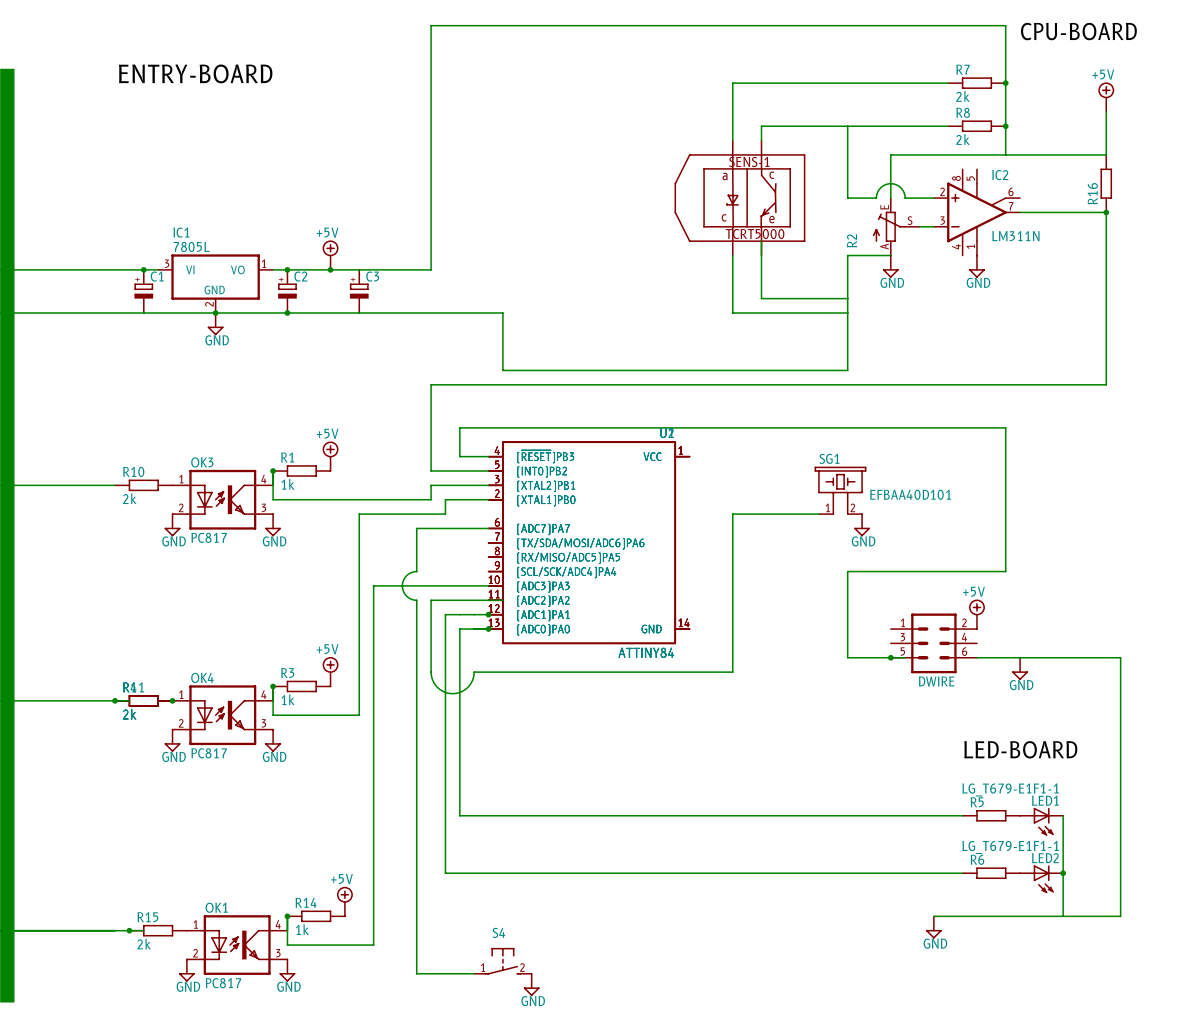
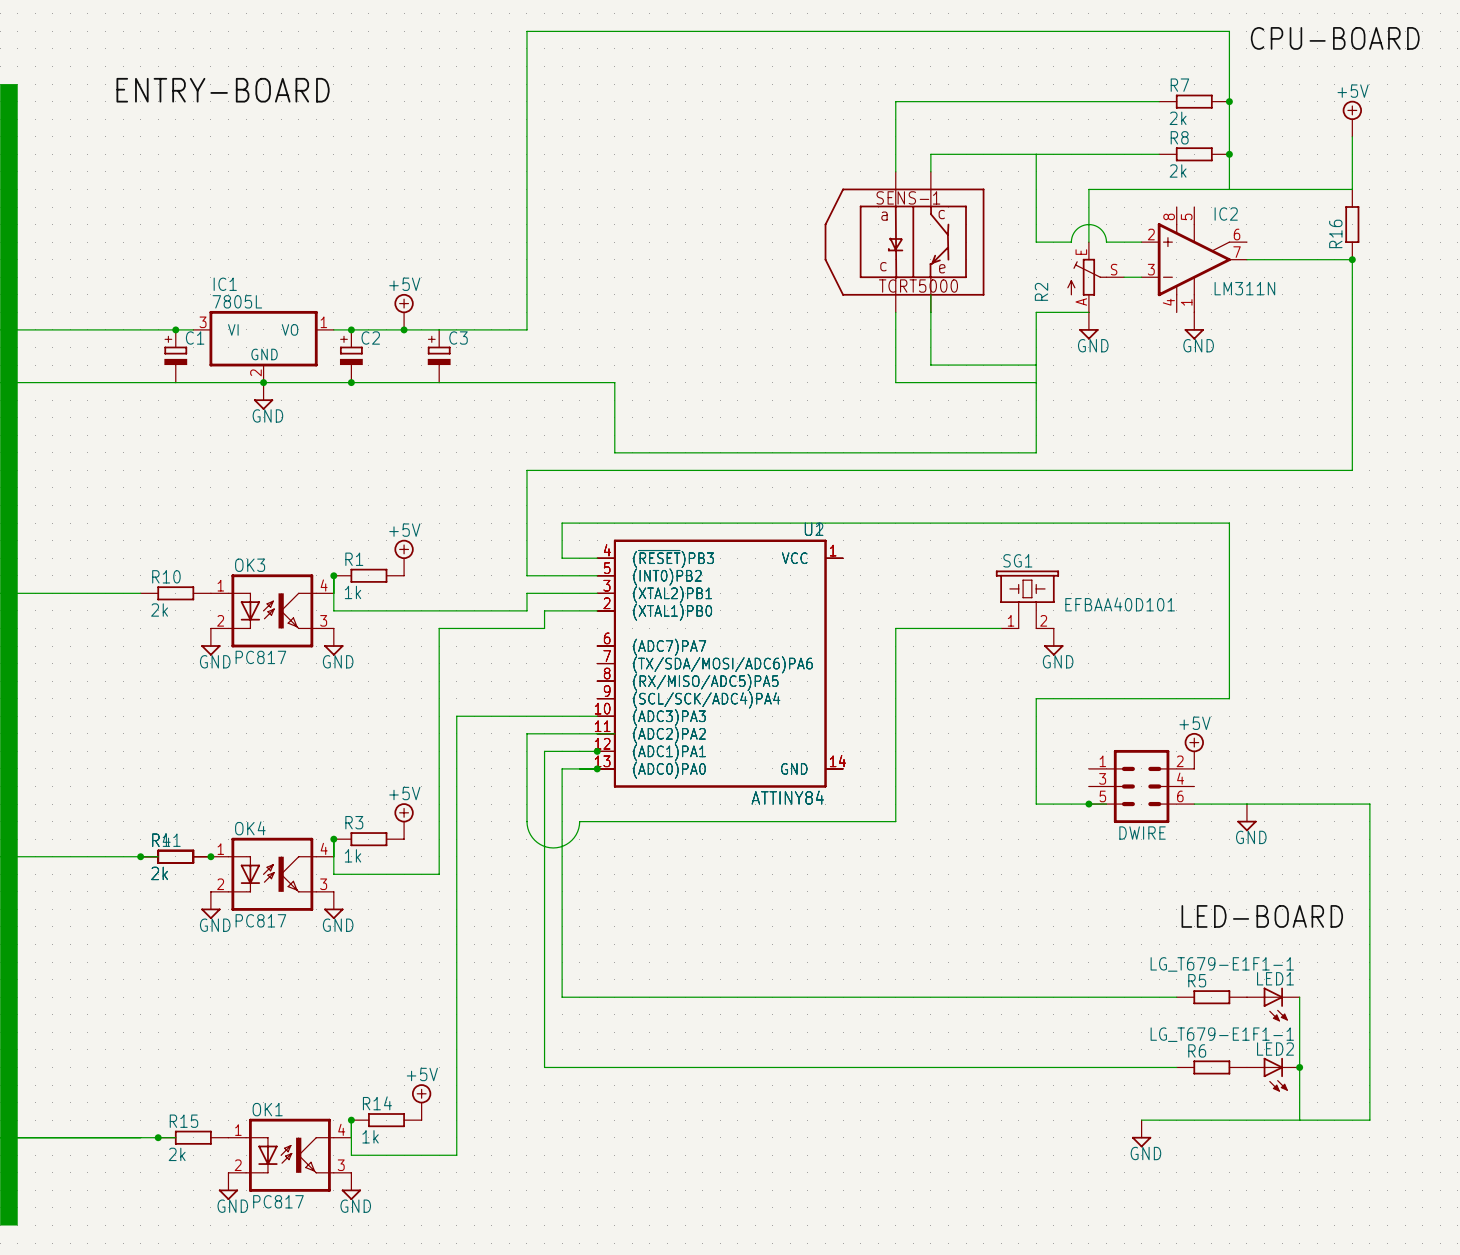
wire: (488, 528) (416, 528) (416, 571) (406, 575) (402, 585) (406, 596) (416, 600) (416, 973) (474, 973) -> none
S4: (502, 961) -> none
power symbol: GND (531, 984) -> none

